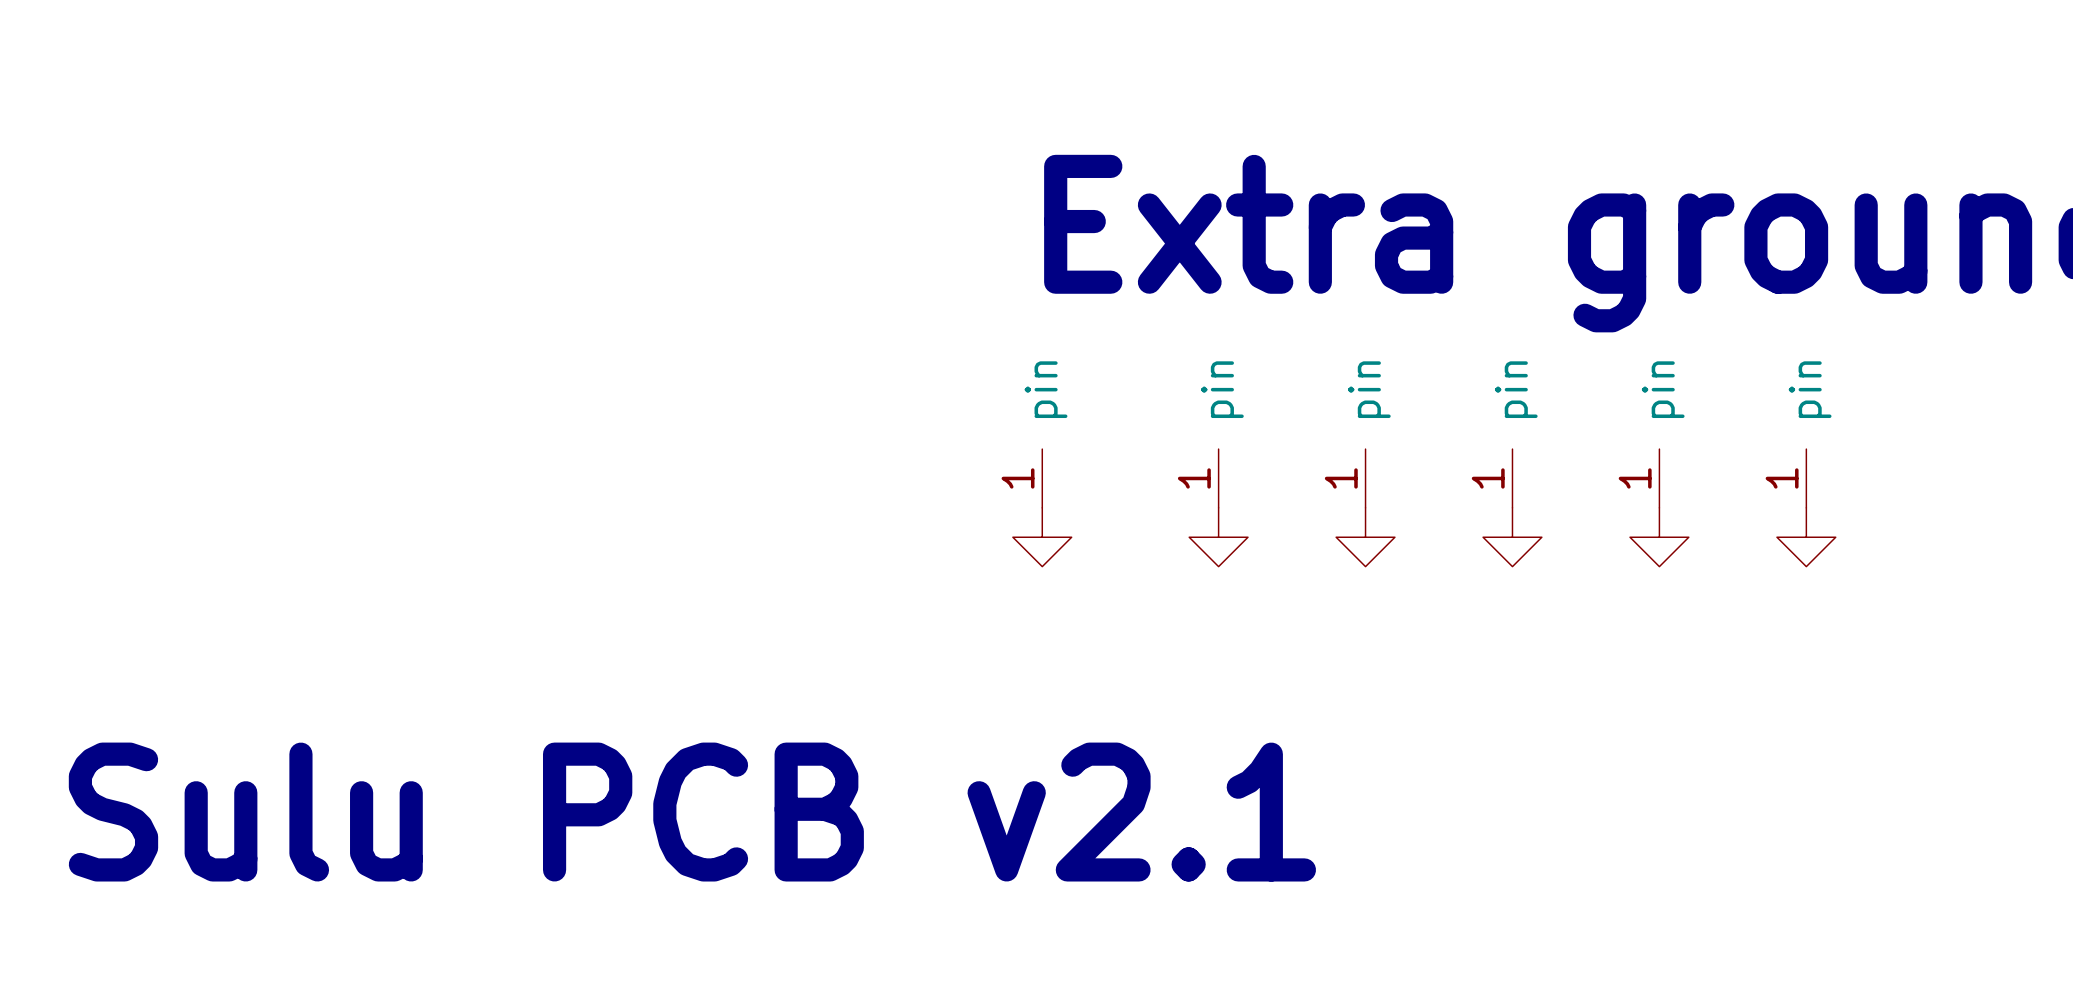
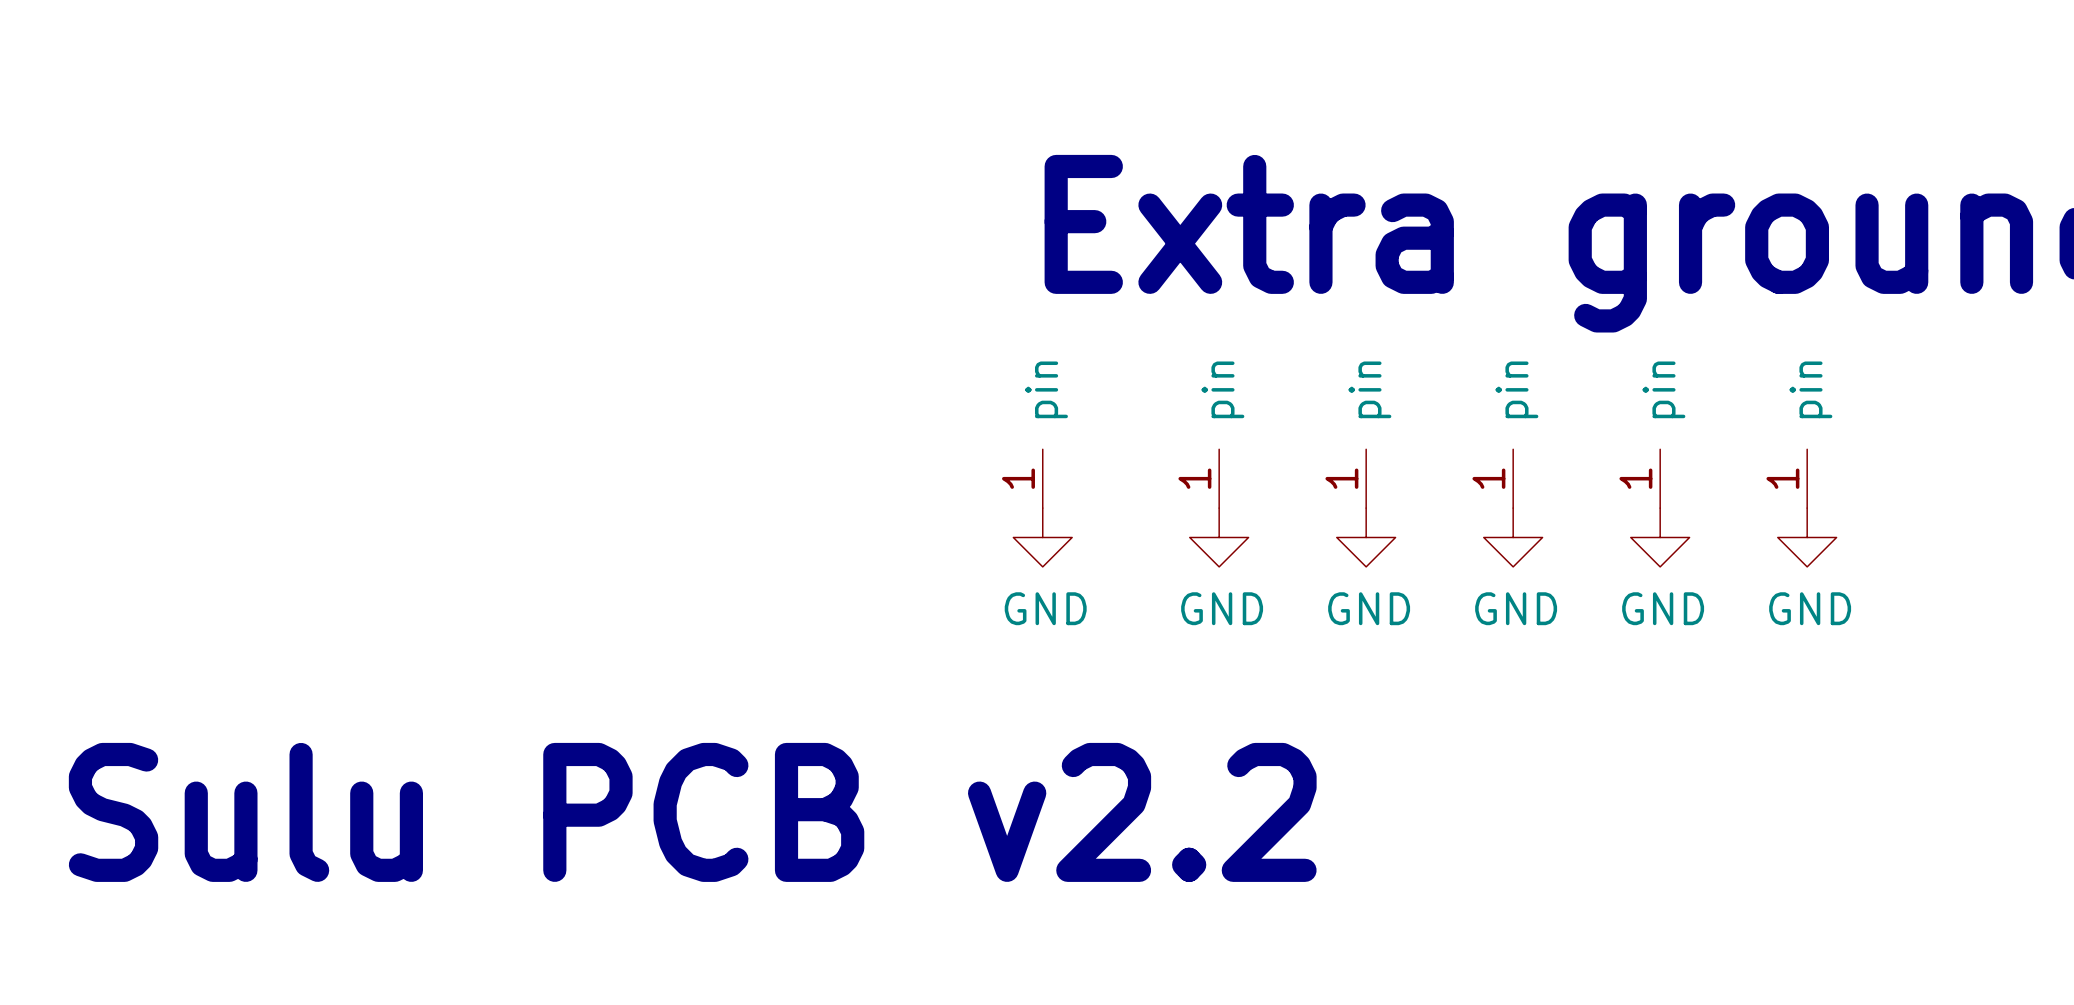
power symbol text: none -> GND (1045, 608)
power symbol text: none -> GND (1222, 608)
power symbol text: none -> GND (1369, 608)
power symbol text: none -> GND (1516, 608)
power symbol text: none -> GND (1663, 608)
power symbol text: none -> GND (1810, 608)
text: Sulu PCB v2.1 (692, 812) -> Sulu PCB v2.2 (692, 812)

